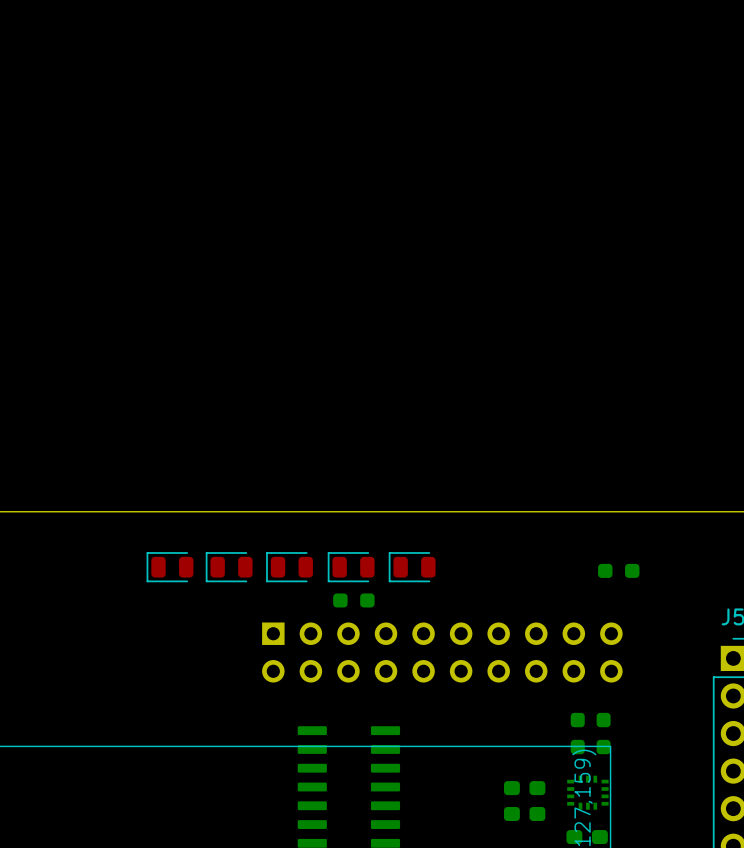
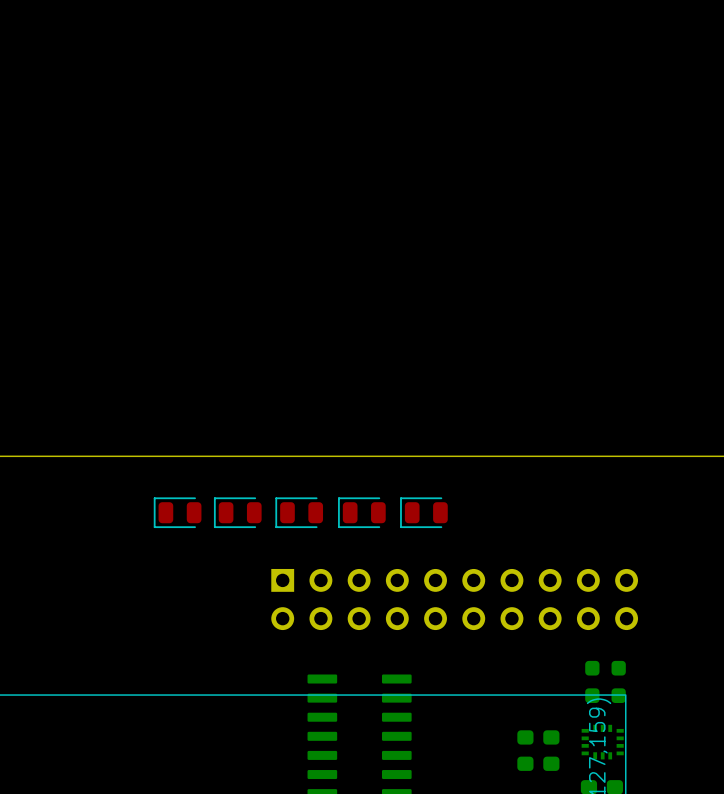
part: (618, 570) -> none
part: (353, 600) -> none

